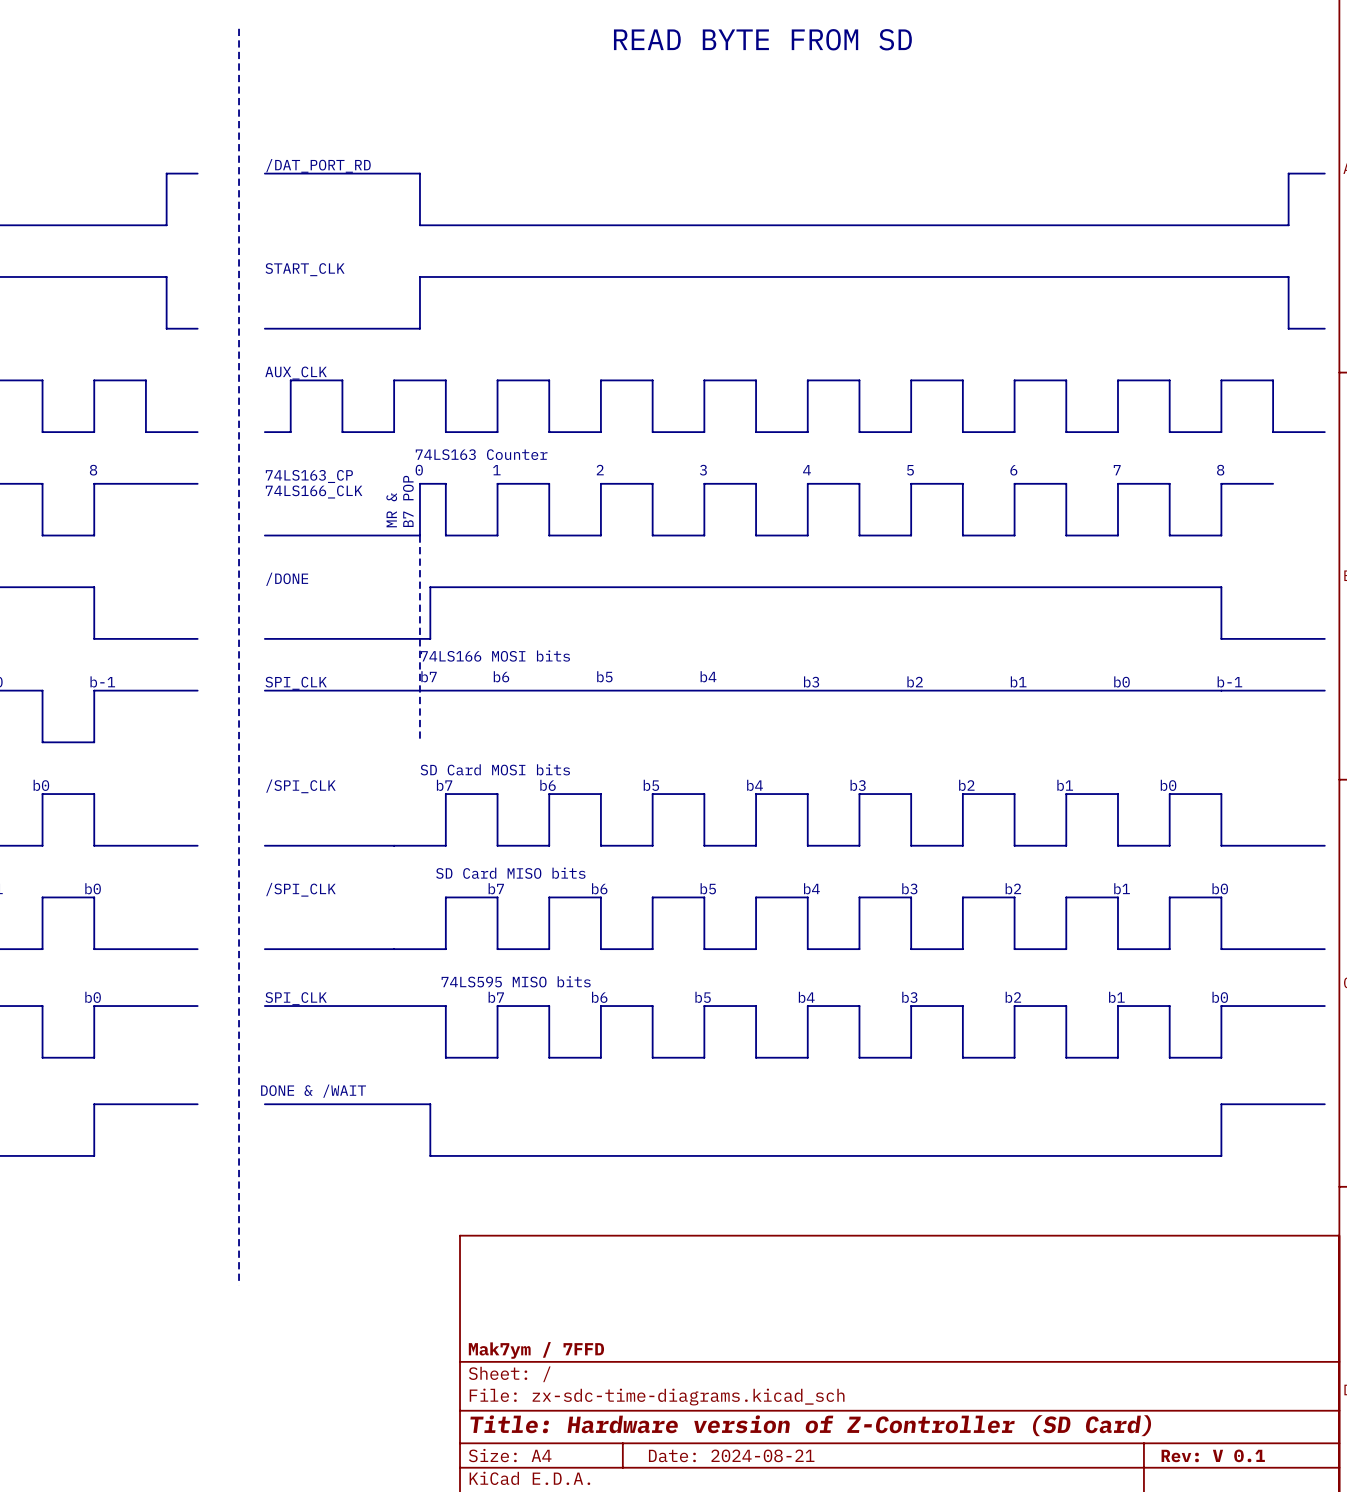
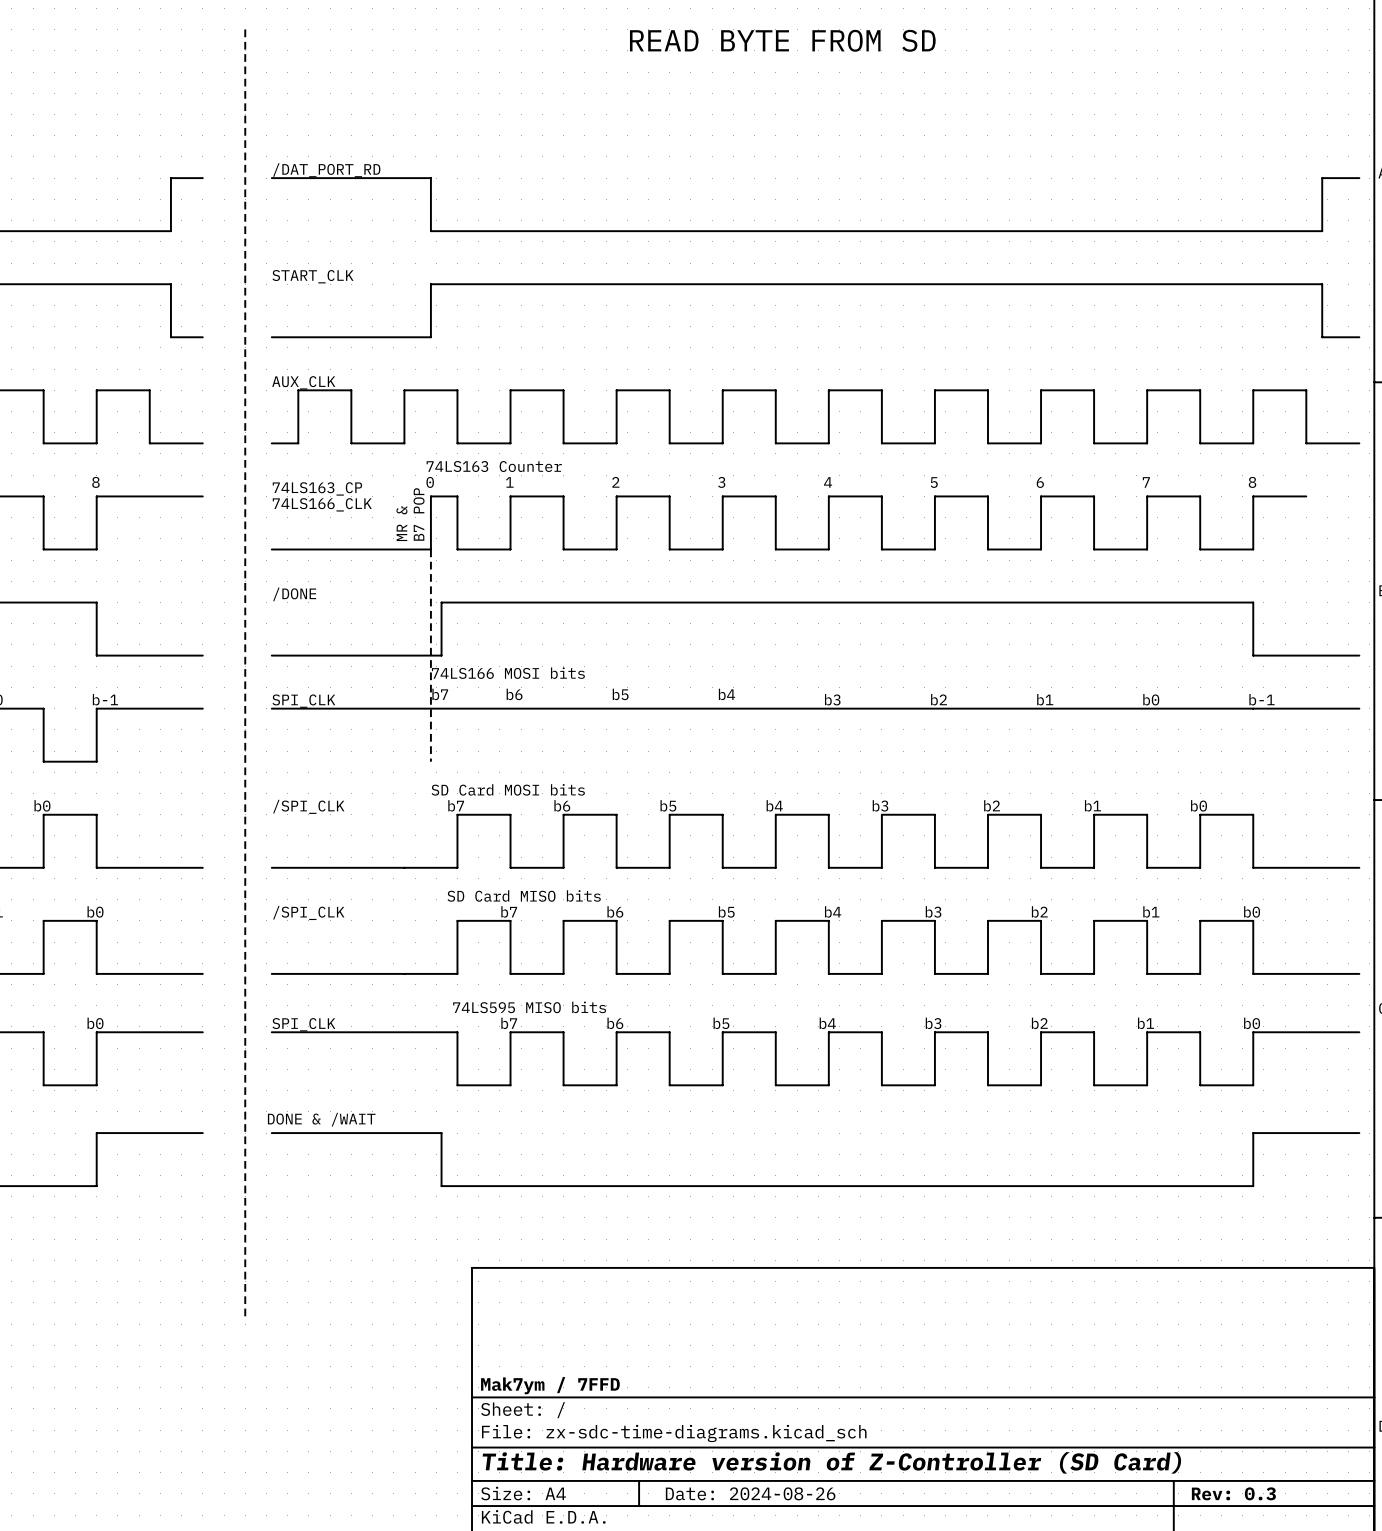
title block: Date: 2024-08-21 (731, 1455) -> Date: 2024-08-26 (750, 1493)
title block: Rev: V 0.1 (1213, 1455) -> Rev: 0.3 (1233, 1493)

